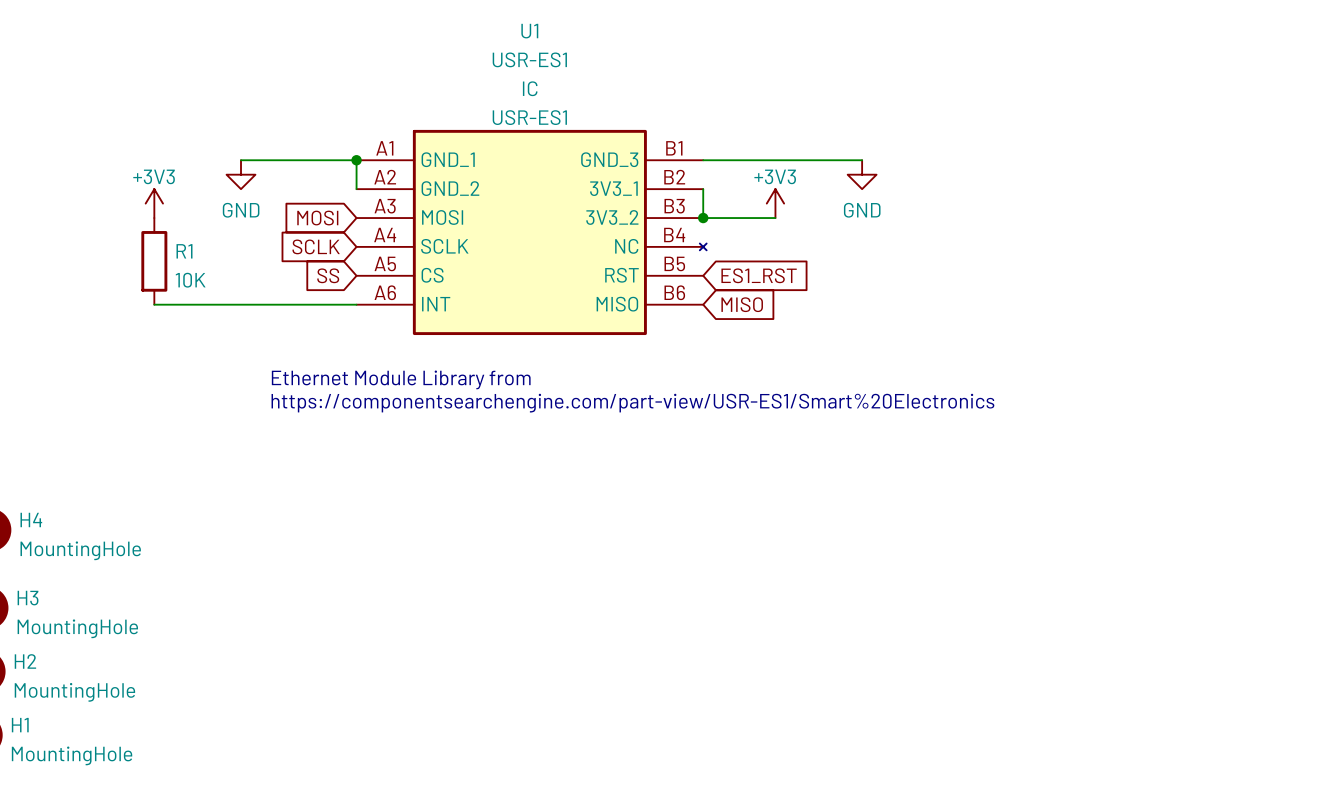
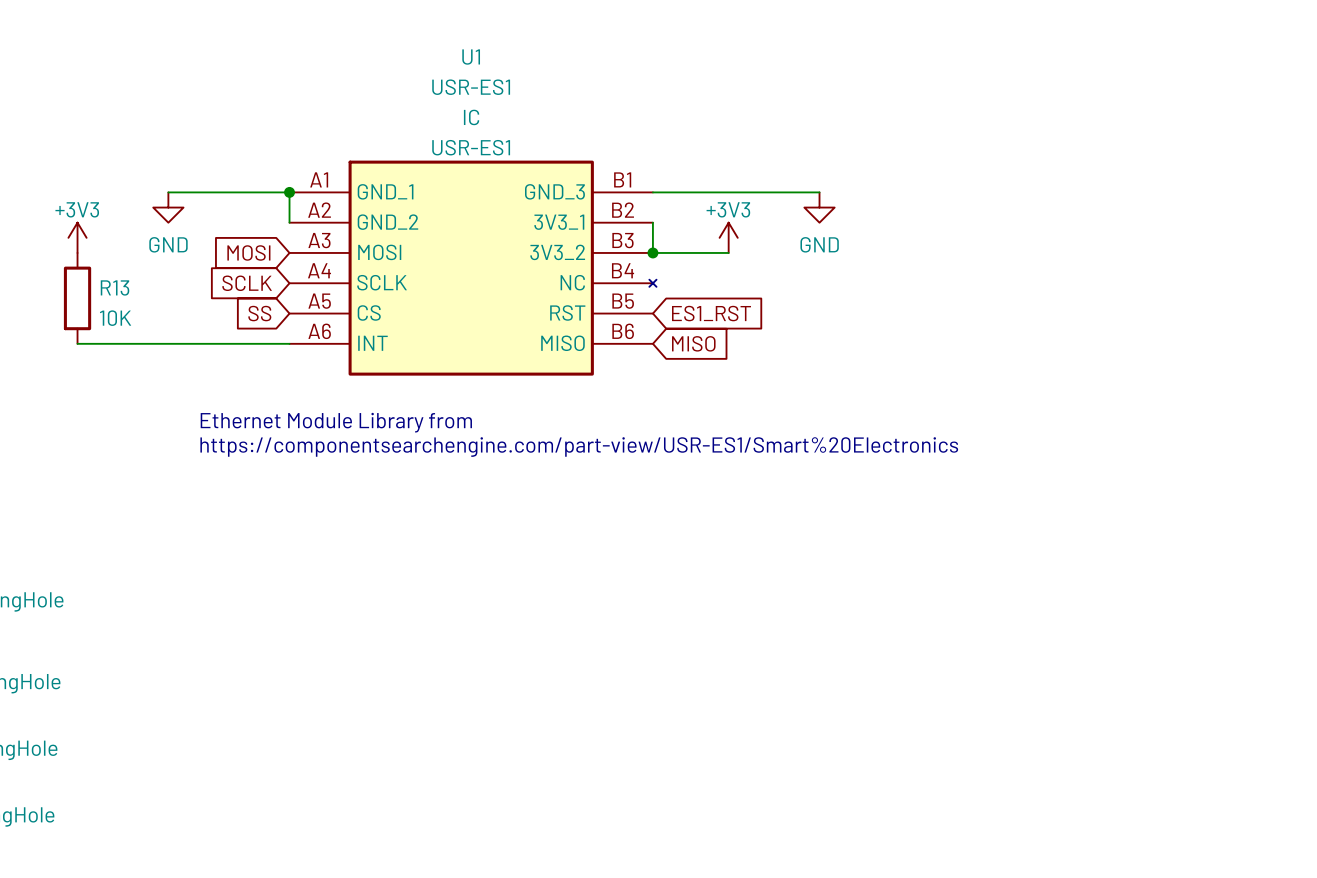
R1 name: R1 (184, 251) -> R13 (115, 287)

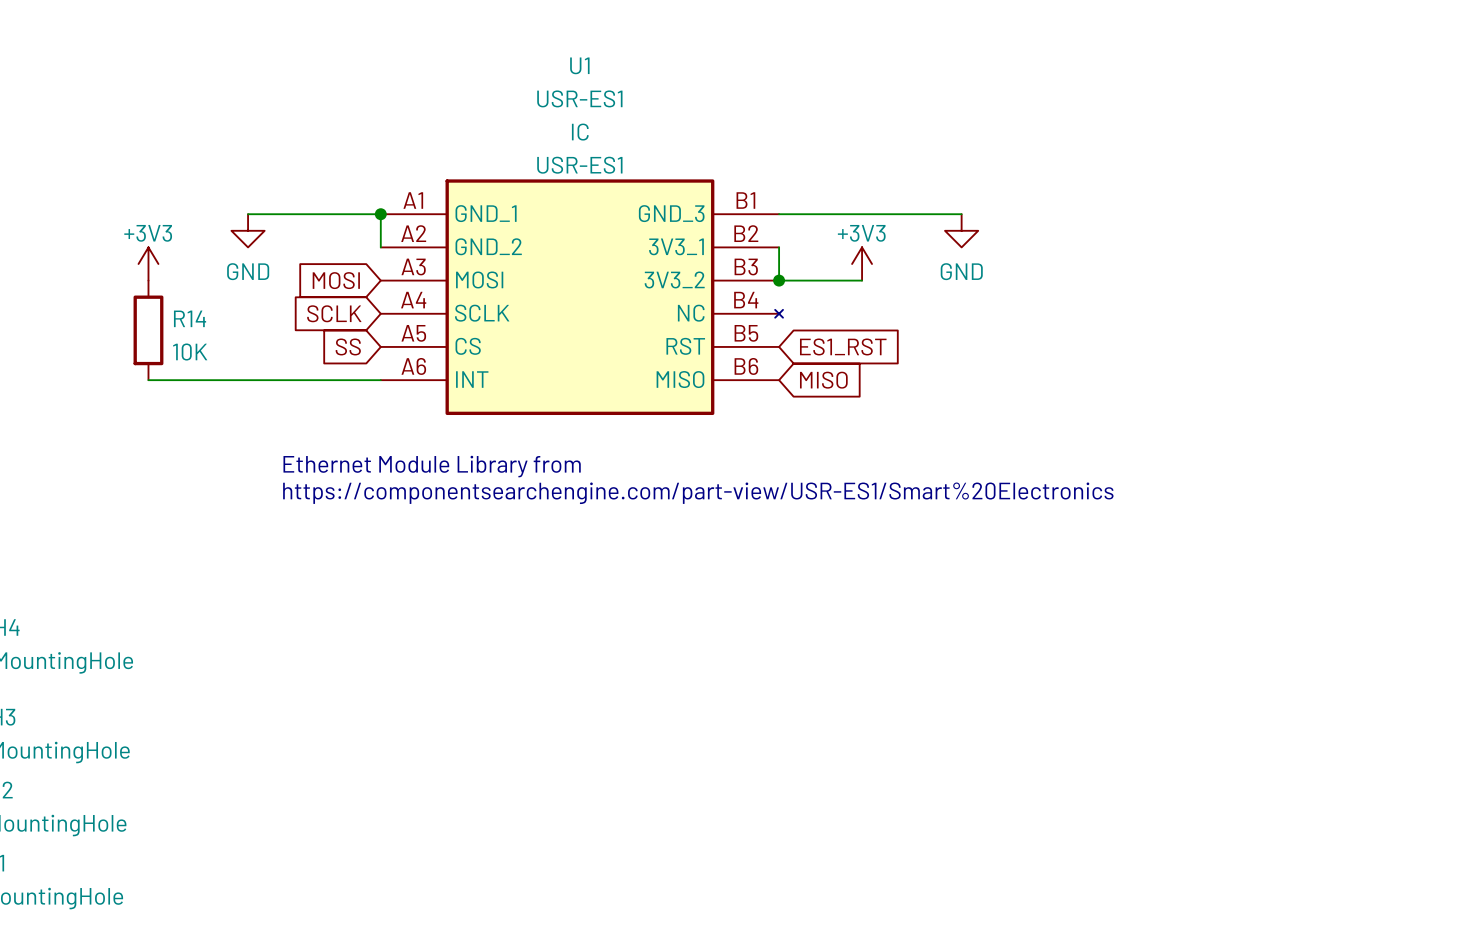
R13 name: R13 (115, 287) -> R14 (190, 318)

